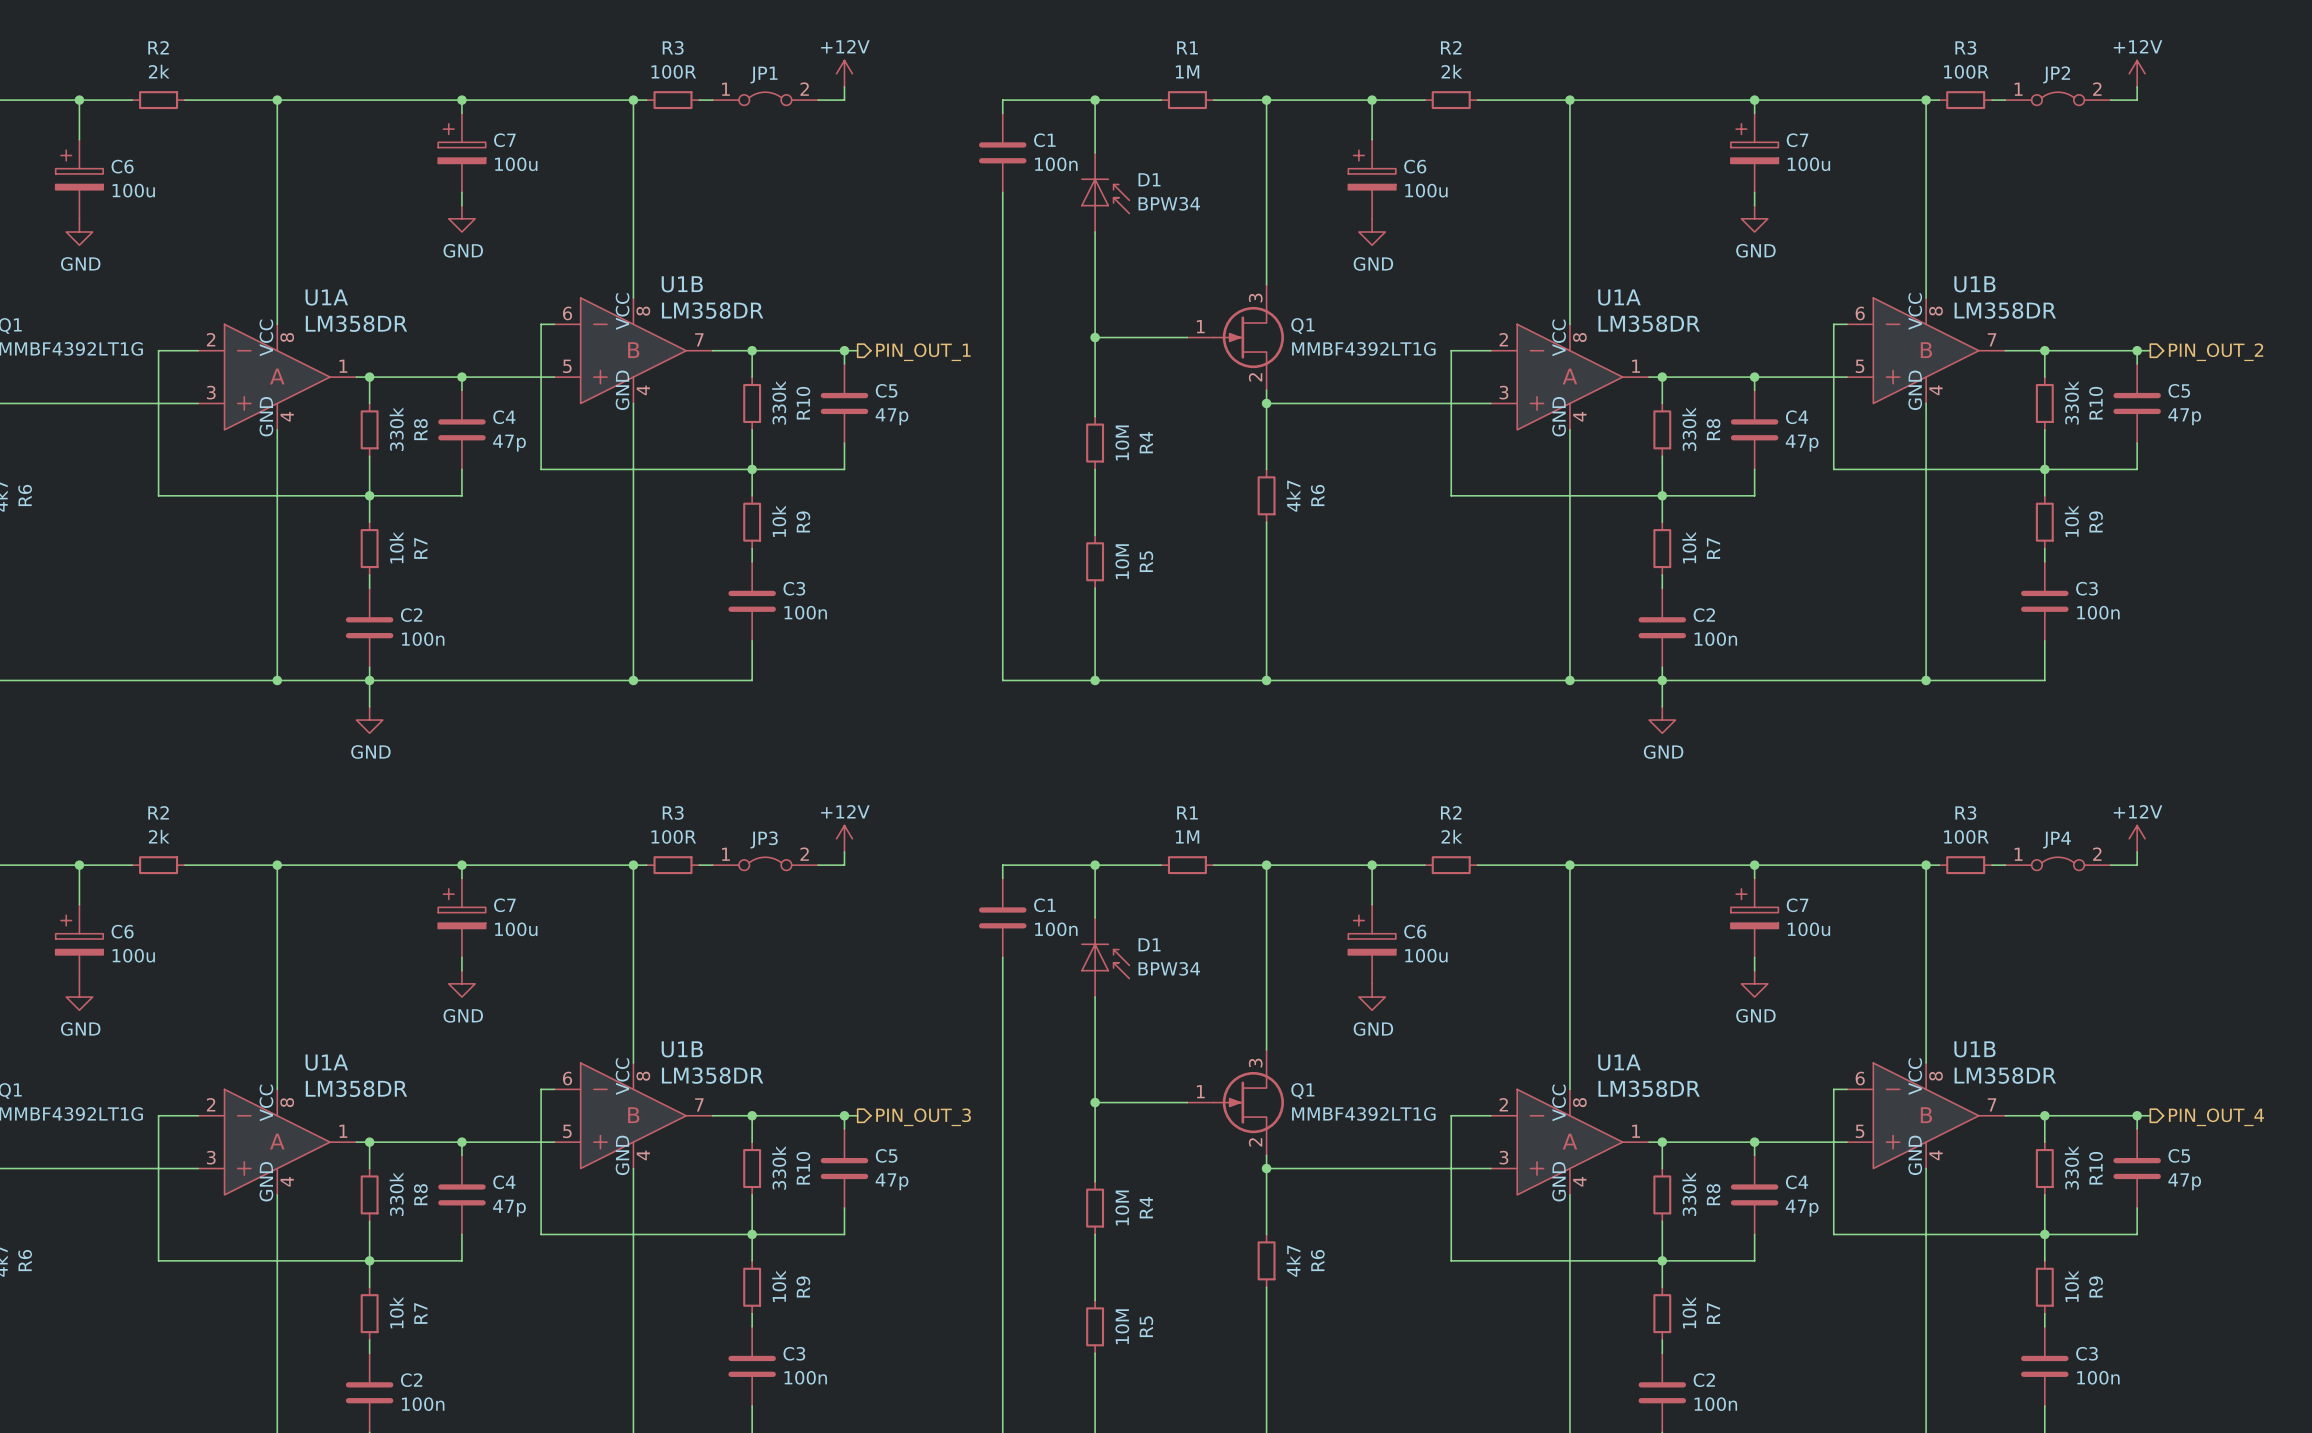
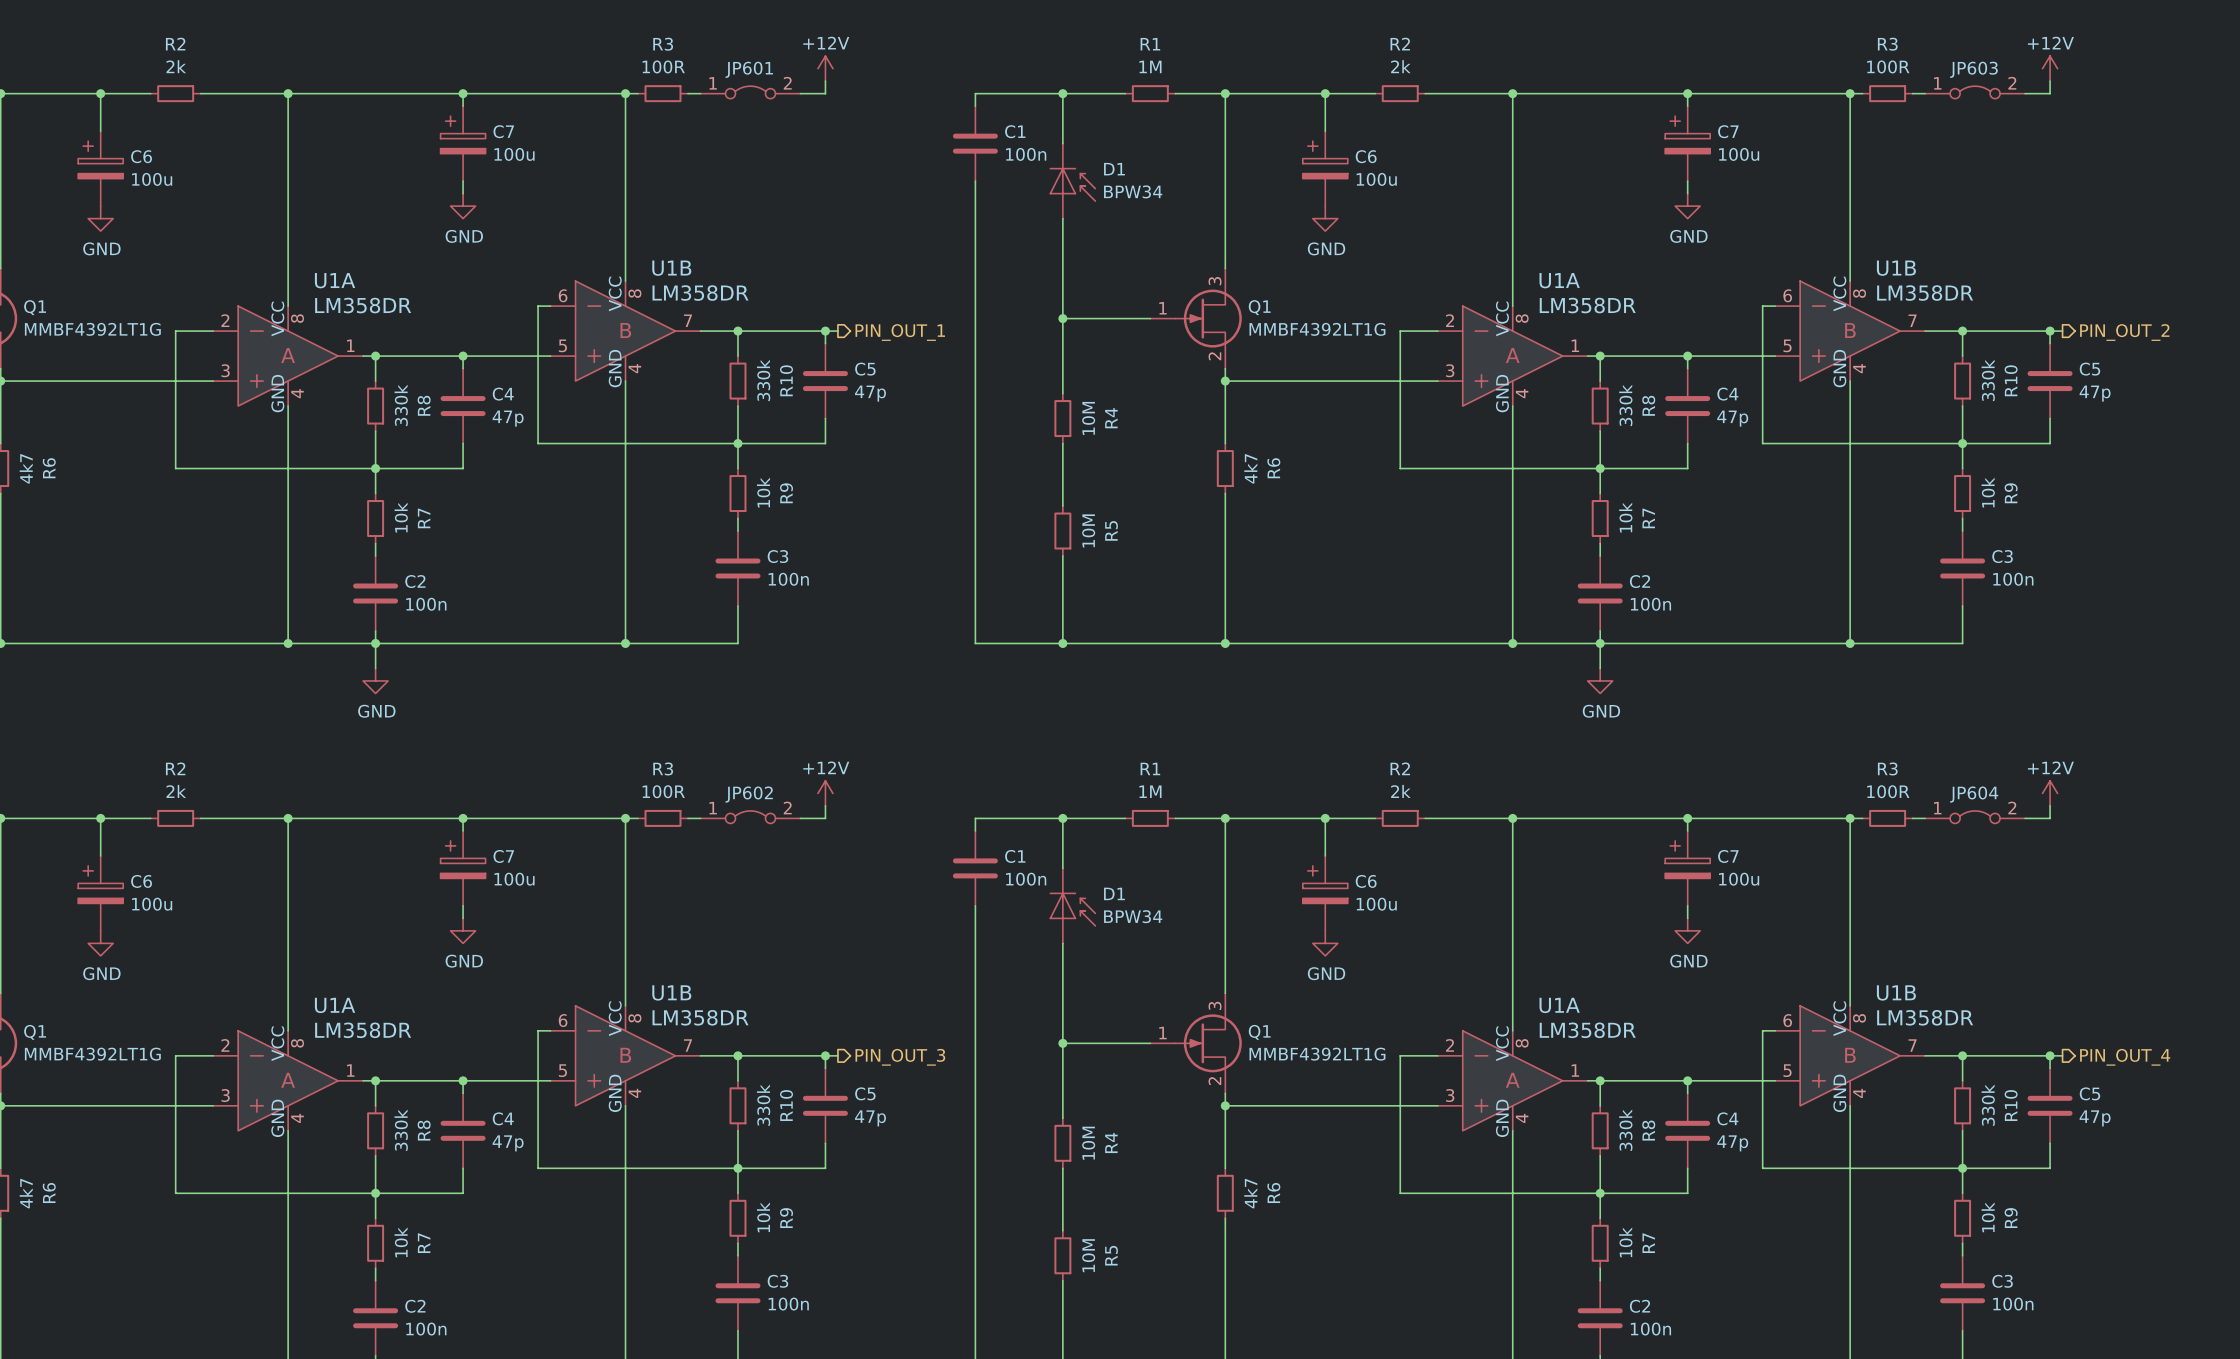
JP2 name: JP2 (2056, 74) -> JP603 (1973, 69)
JP1 name: JP1 (764, 75) -> JP601 (749, 69)
JP3 name: JP3 (764, 839) -> JP602 (749, 794)
JP4 name: JP4 (2057, 840) -> JP604 (1974, 794)

